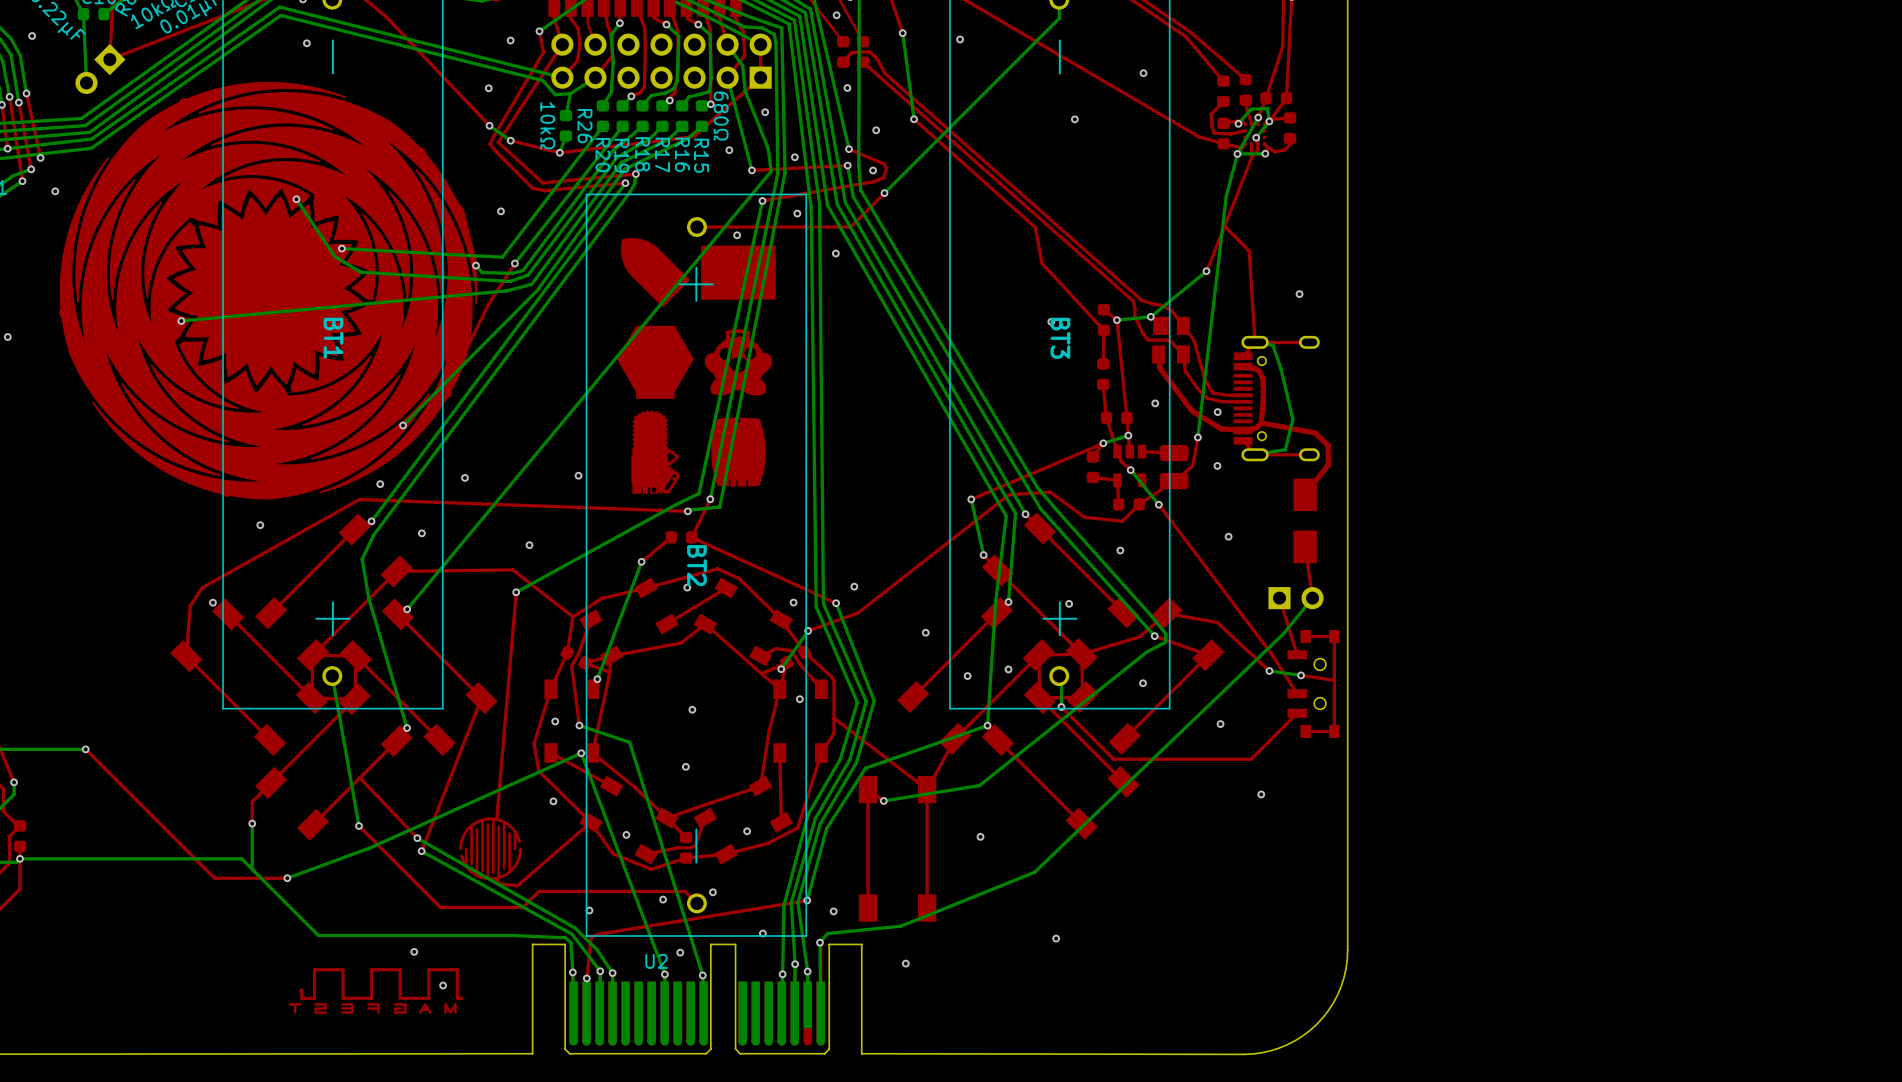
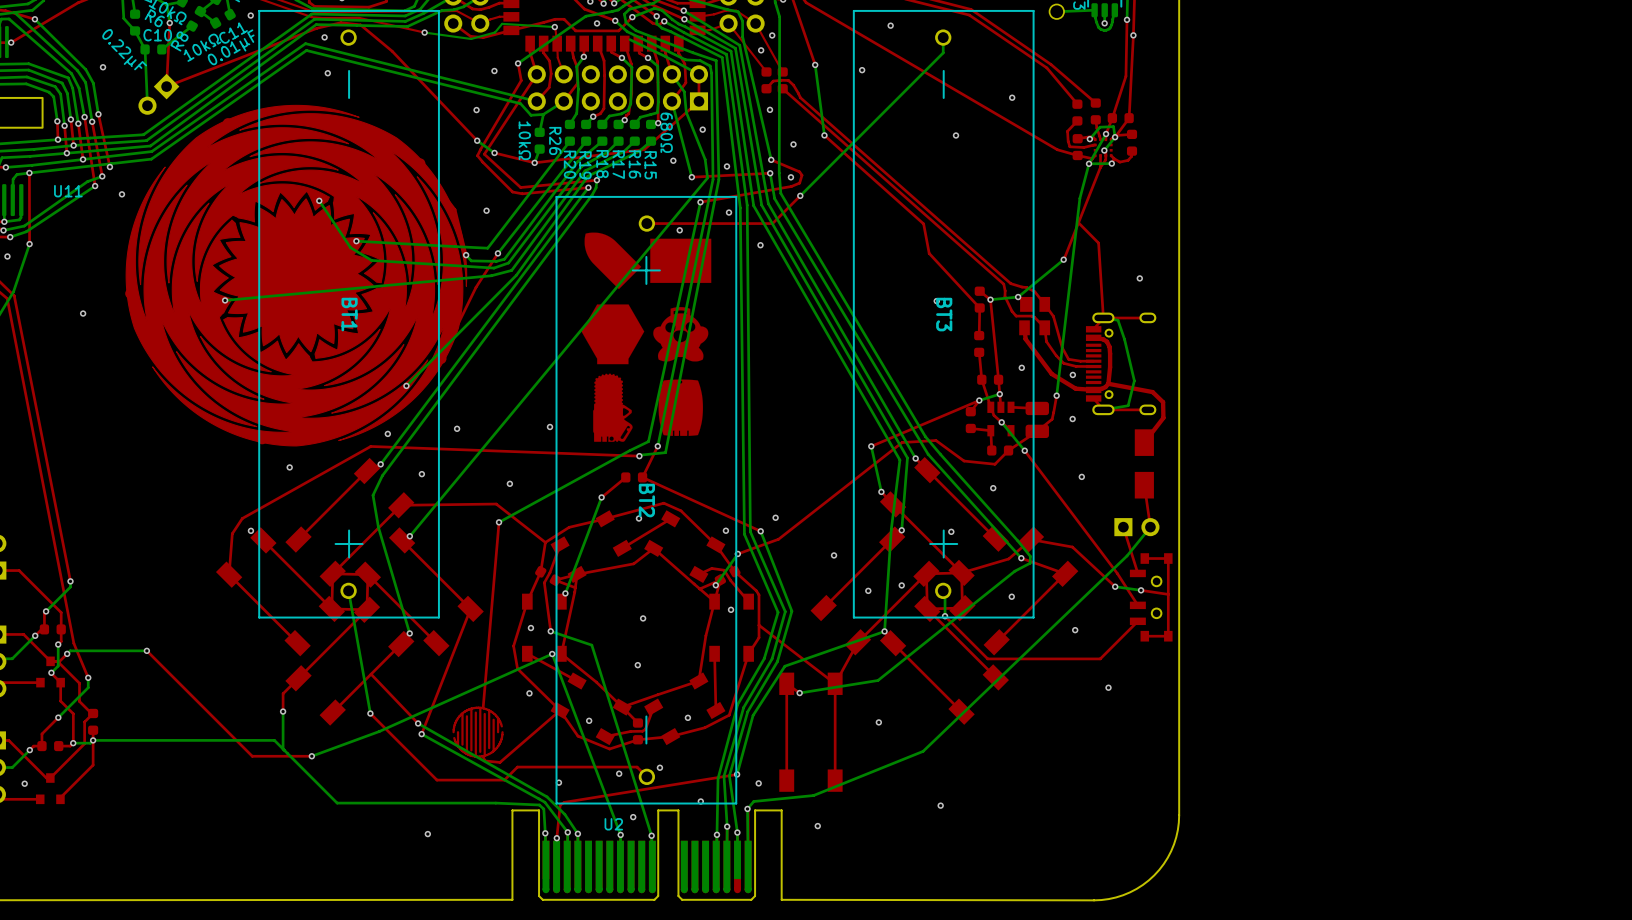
via: (414, 951) -> none
drawing: [288, 968, 464, 1014] -> none
via: none -> (427, 834)
via: (443, 985) -> none

